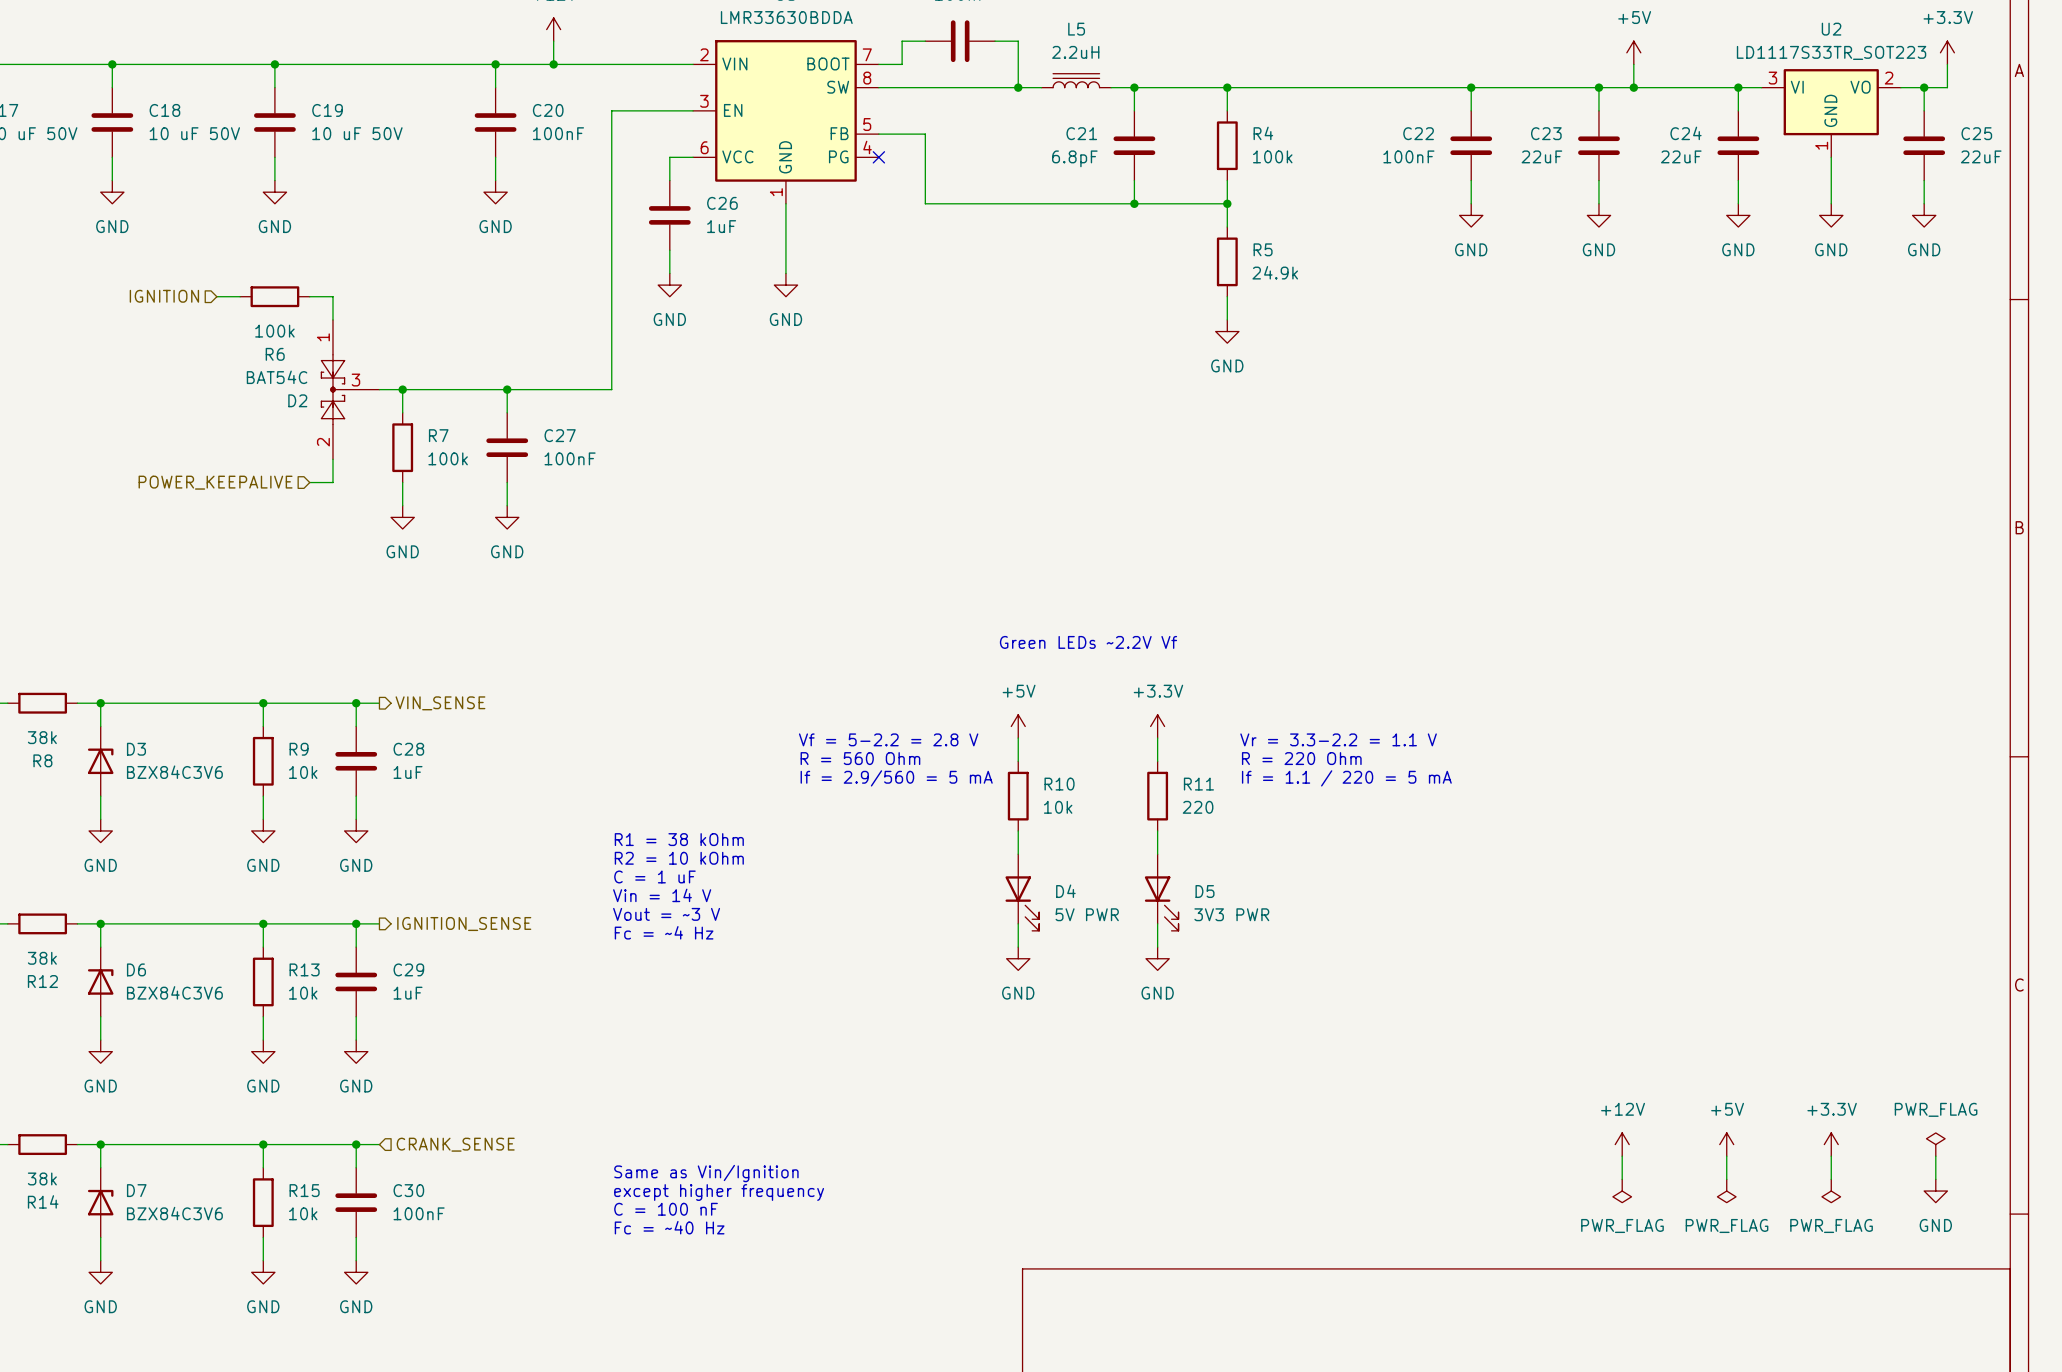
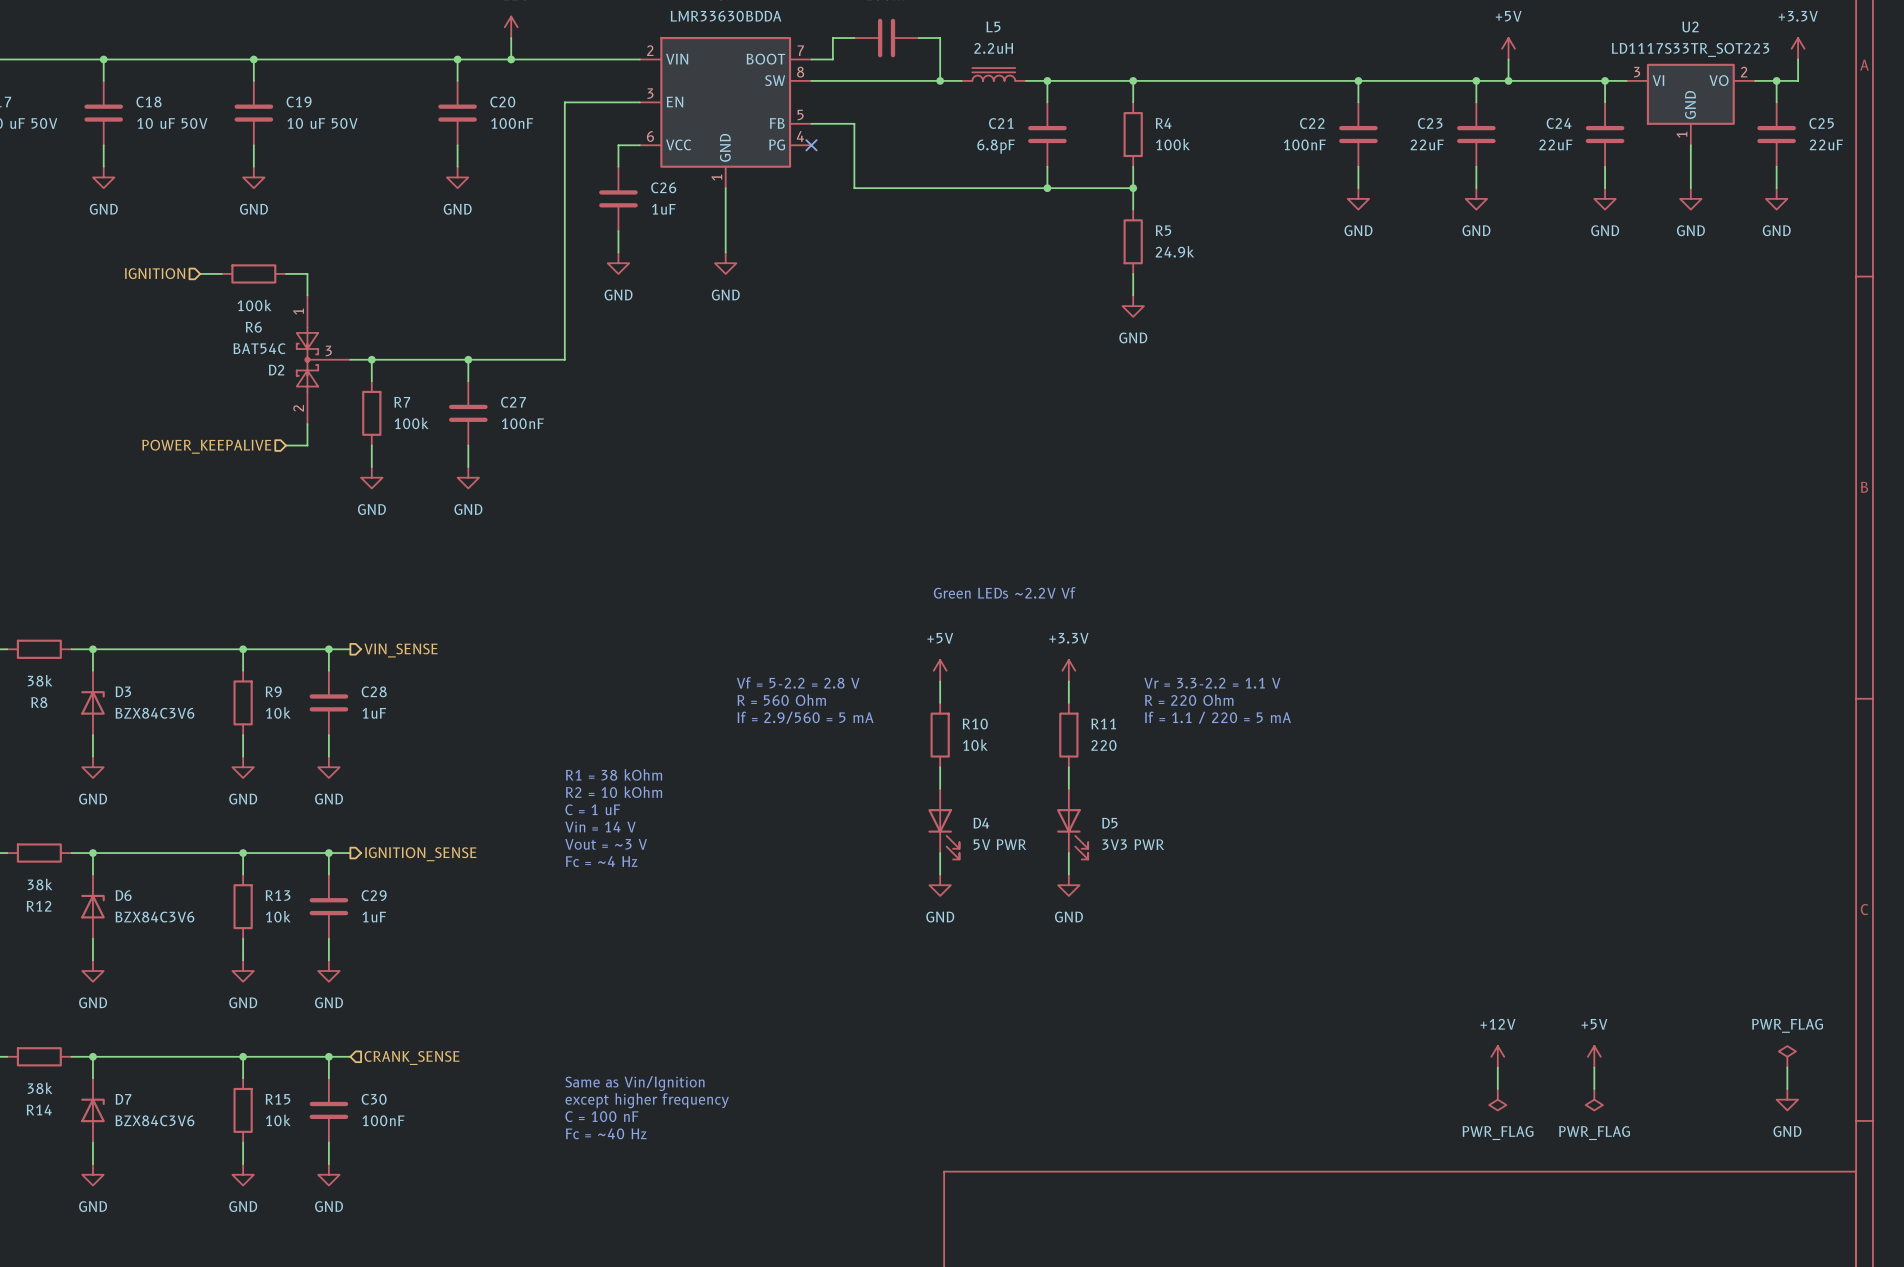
power symbol: +3.3V (1831, 1144) -> none
wire: (1831, 1156) (1831, 1179) -> none
power symbol: PWR_FLAG (1831, 1191) -> none

